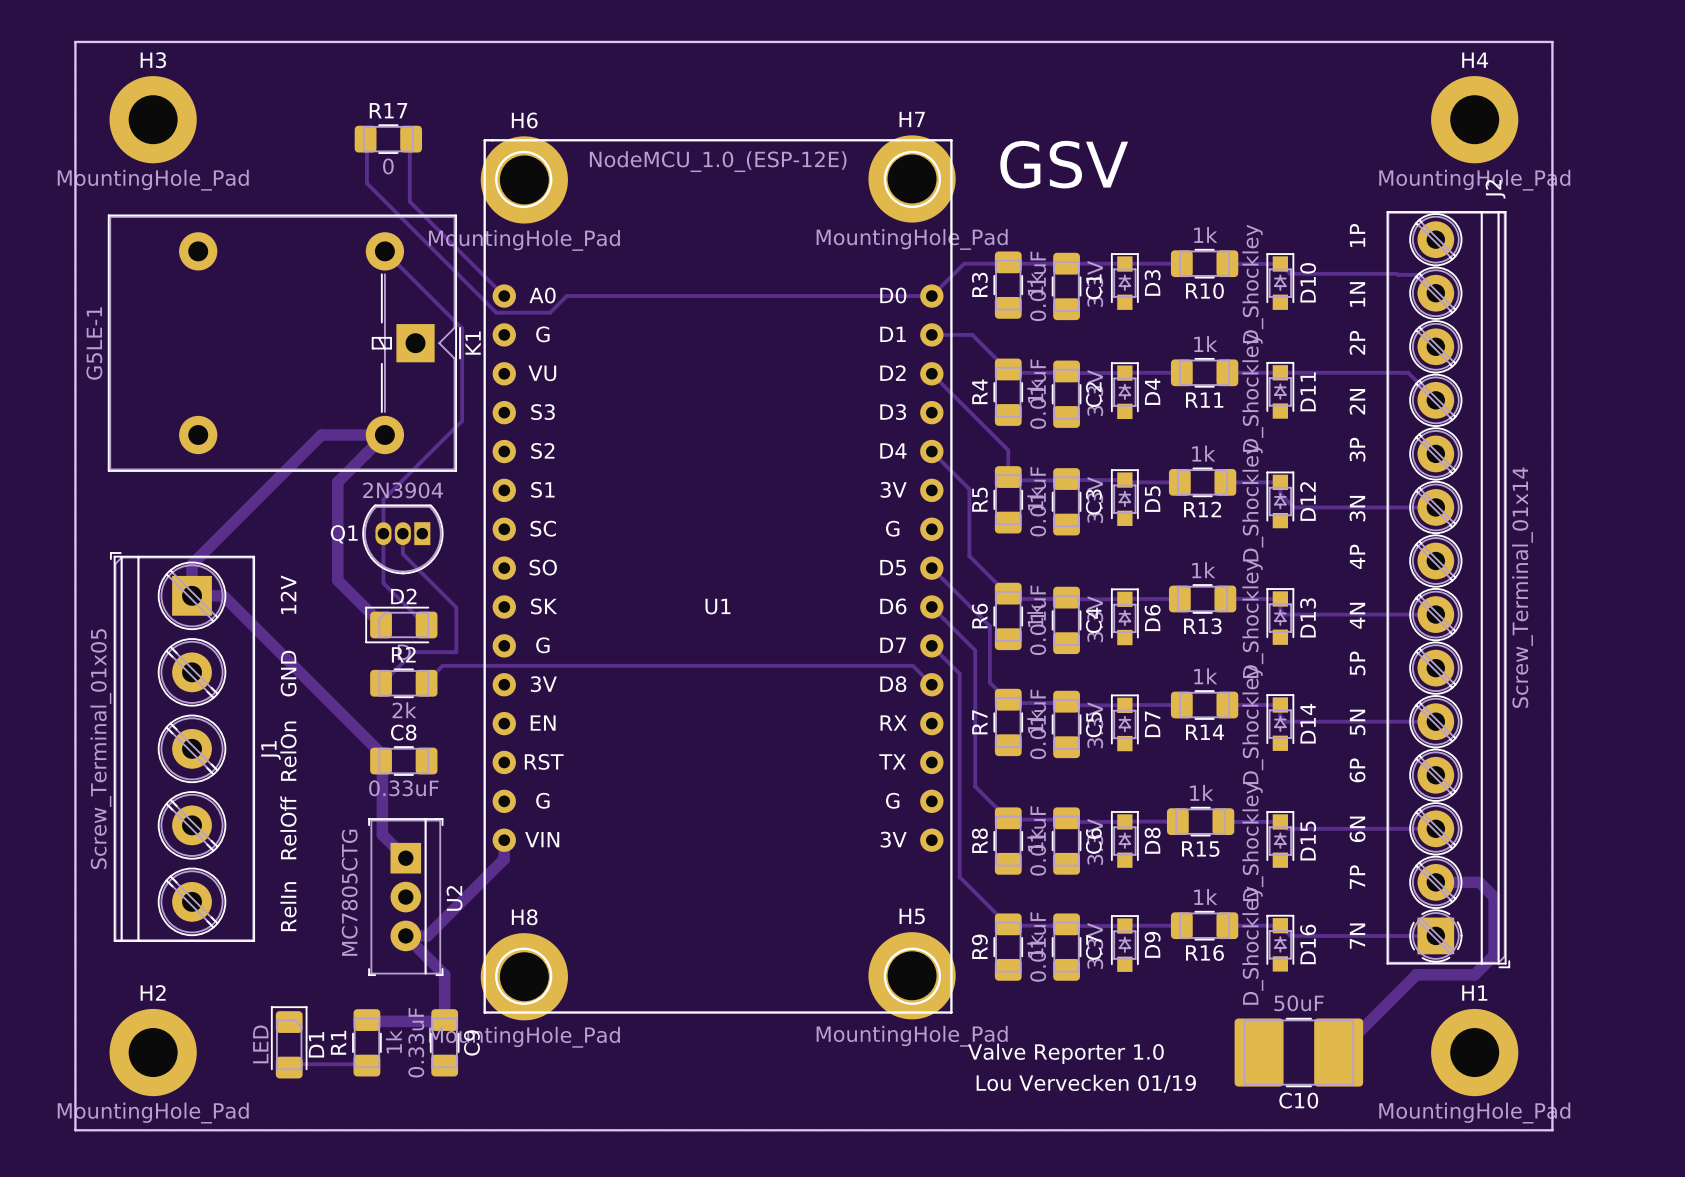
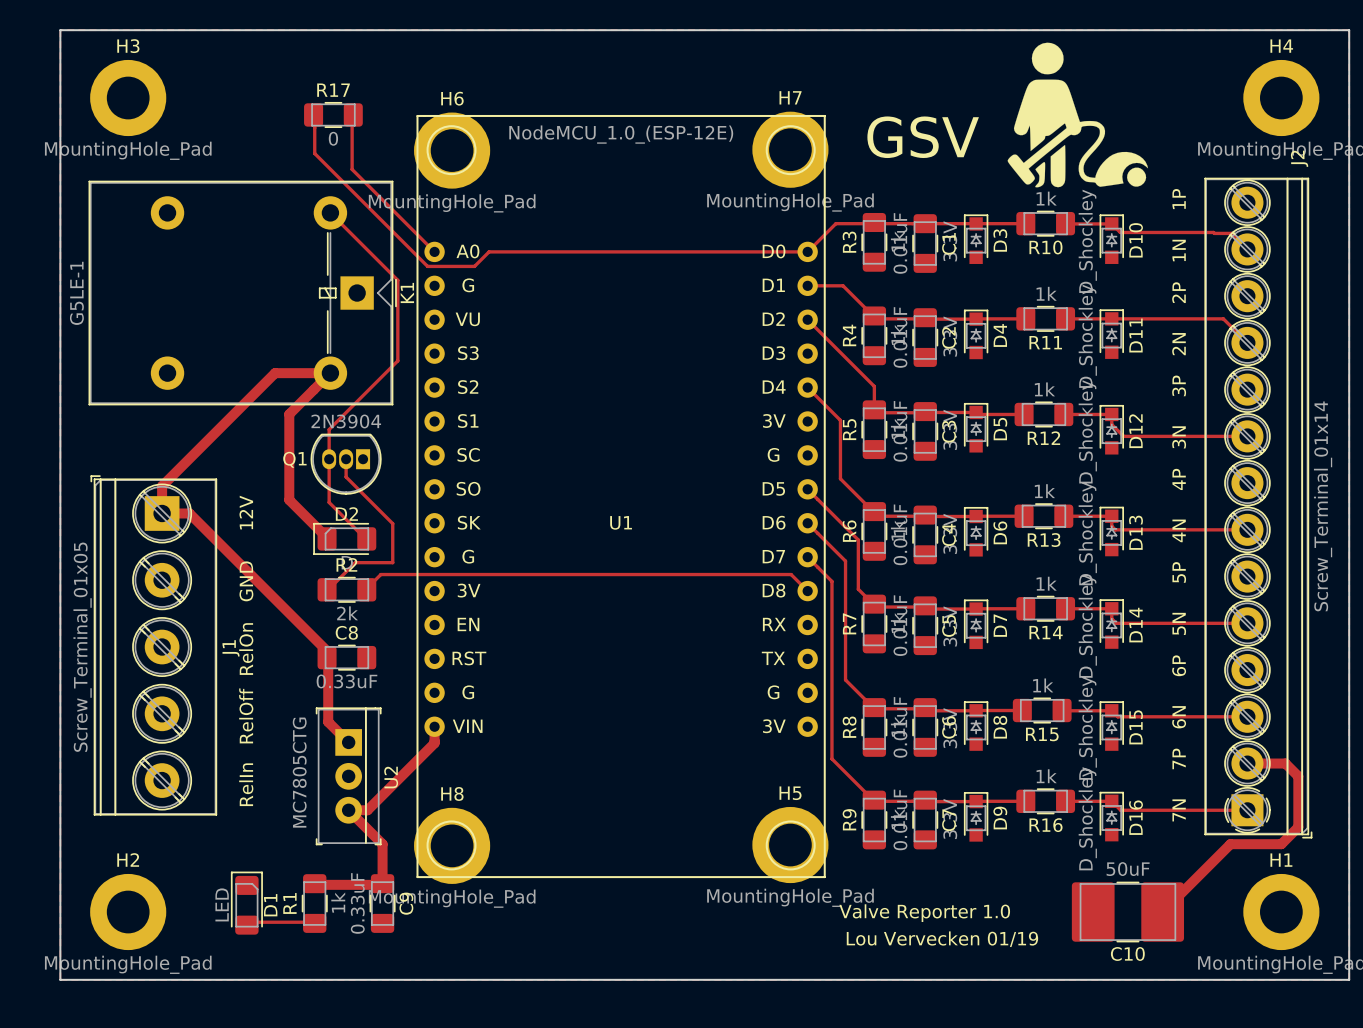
drawing: none -> [1007, 42, 1149, 188]

